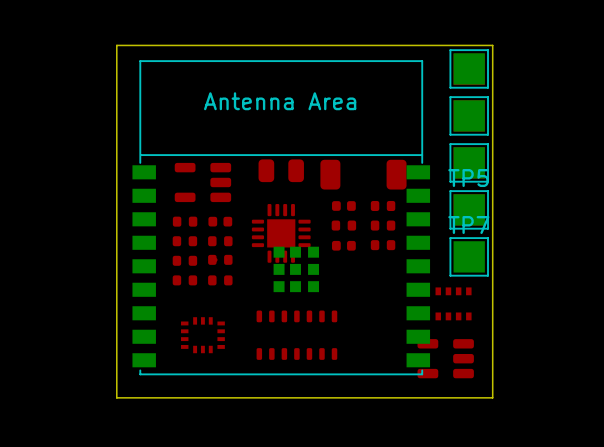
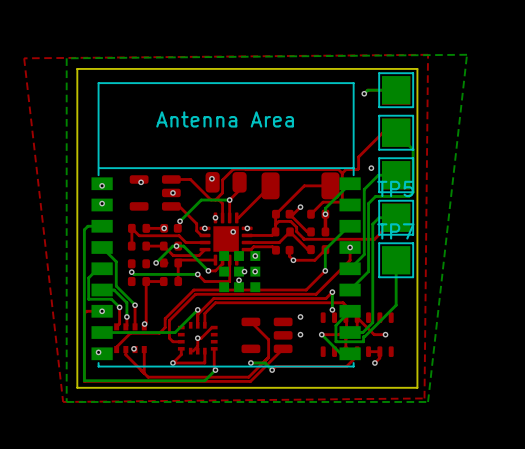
top zone outline: none -> (428, 54) (424, 398) (63, 401) (24, 58) (428, 54)
bottom zone outline: none -> (467, 54) (428, 401) (66, 401) (66, 58) (467, 54)
bottom track: none -> (396, 90) (367, 90) (364, 93)
via: none -> (364, 93)
top track: none -> (396, 132) (382, 132) (358, 157) (357, 169) (346, 169) (342, 173)
bottom track: none -> (396, 132) (413, 149) (413, 192) (408, 196) (375, 196) (368, 203) (368, 271) (350, 290)
via: none -> (371, 168)
top track: none -> (342, 173) (342, 200) (323, 202) (310, 214)
top track: none -> (342, 173) (338, 169) (233, 169) (222, 180) (222, 192) (215, 200)
bottom track: none -> (396, 175) (378, 175) (364, 189) (364, 254) (350, 268)
via: none -> (211, 178)
top track: none -> (171, 179) (190, 179) (211, 200) (219, 200) (222, 203) (222, 217)
via: none -> (141, 182)
top track: none -> (239, 182) (239, 190) (229, 200) (229, 217)
bottom track: none -> (350, 183) (325, 208) (325, 214)
via: none -> (102, 185)
top track: none -> (270, 185) (236, 217)
top track: none -> (330, 185) (304, 185) (275, 214) (275, 231) (272, 235) (247, 235)
via: none -> (172, 192)
bottom track: none -> (229, 200) (201, 200) (180, 221)
via: none -> (229, 200)
via: none -> (102, 203)
top track: none -> (171, 206) (179, 206) (196, 223) (196, 230) (201, 235) (205, 235)
top track: none -> (300, 207) (293, 214) (289, 214) (307, 231) (310, 231)
via: none -> (300, 207)
top track: none -> (325, 214) (325, 231)
via: none -> (325, 214)
via: none -> (215, 217)
top track: none -> (396, 217) (374, 239) (304, 239)
bottom track: none -> (396, 217) (379, 217) (372, 224) (372, 322) (362, 332) (350, 332)
via: none -> (180, 221)
top track: none -> (275, 224) (278, 221) (290, 221) (304, 239)
bottom track: none -> (102, 226) (87, 226) (84, 229) (84, 380) (204, 380) (215, 370)
bottom track: none -> (350, 226) (325, 249) (325, 270)
top track: none -> (164, 228) (146, 228)
via: none -> (164, 228)
via: none -> (204, 228)
via: none -> (247, 228)
via: none -> (233, 231)
top track: none -> (205, 242) (185, 242) (179, 235) (139, 235) (131, 228) (131, 245)
top track: none -> (247, 242) (279, 242) (290, 231) (307, 249) (310, 249)
top track: none -> (146, 246) (163, 246) (173, 255) (199, 255) (205, 249)
via: none -> (176, 246)
bottom track: none -> (102, 247) (116, 261) (116, 286) (135, 305)
top track: none -> (350, 247) (350, 260) (316, 294) (195, 294) (169, 320) (169, 338) (172, 341) (181, 341)
via: none -> (350, 247)
top track: none -> (247, 249) (253, 246) (272, 246) (275, 250)
top track: none -> (325, 249) (314, 260) (293, 260) (289, 256) (289, 250)
via: none -> (255, 256)
top track: none -> (215, 260) (181, 260) (178, 262) (178, 281)
top track: none -> (222, 260) (222, 263) (215, 270) (208, 270)
top track: none -> (229, 260) (229, 281) (204, 281) (197, 274)
via: none -> (293, 260)
bottom track: none -> (396, 260) (396, 305) (363, 336) (363, 341) (335, 341) (335, 325) (350, 311)
bottom track: none -> (156, 262) (172, 246) (183, 246) (208, 270)
via: none -> (156, 262)
bottom track: none -> (102, 268) (97, 268) (88, 277) (88, 299) (111, 299) (119, 307)
via: none -> (208, 270)
top track: none -> (325, 270) (306, 290) (193, 290) (165, 318) (165, 327) (159, 333) (130, 333) (116, 347) (116, 349)
via: none -> (325, 270)
via: none -> (244, 271)
via: none -> (255, 271)
bottom track: none -> (131, 272) (133, 274) (197, 274)
via: none -> (131, 272)
via: none -> (197, 274)
via: none -> (239, 280)
top track: none -> (163, 281) (146, 281) (146, 322) (144, 324)
bottom track: none -> (102, 290) (114, 290) (126, 302) (126, 316)
top track: none -> (332, 292) (326, 298) (213, 298) (197, 314)
bottom track: none -> (332, 292) (332, 309)
via: none -> (332, 292)
part position: (453, 303) -> (130, 338)
top track: none -> (135, 305) (135, 326)
via: none -> (135, 305)
top track: none -> (119, 307) (119, 323) (116, 326)
via: none -> (119, 307)
top track: none -> (197, 309) (197, 325)
bottom track: none -> (197, 309) (175, 332) (102, 332)
via: none -> (197, 309)
via: none -> (332, 309)
top track: none -> (102, 311) (86, 311) (84, 313) (84, 381) (250, 381) (283, 348)
via: none -> (102, 311)
top track: none -> (126, 316) (125, 326)
via: none -> (126, 316)
via: none -> (300, 316)
top track: none -> (250, 321) (268, 339) (268, 357) (248, 377) (148, 377) (125, 354) (125, 349)
via: none -> (144, 324)
top track: none -> (204, 325) (204, 313) (215, 302) (343, 302) (346, 306) (346, 327) (339, 334) (321, 334)
top track: none -> (214, 327) (201, 338) (197, 338) (197, 346) (192, 351)
part position: (202, 335) -> (197, 338)
part position: (296, 335) -> (357, 334)
via: none -> (300, 334)
bottom track: none -> (321, 334) (340, 353) (350, 353)
via: none -> (321, 334)
top track: none -> (385, 334) (374, 334) (357, 317) (357, 327) (345, 338) (345, 351)
via: none -> (385, 334)
via: none -> (197, 338)
via: none -> (133, 348)
top track: none -> (181, 348) (181, 354) (172, 363) (204, 363) (204, 351)
top track: none -> (214, 348) (215, 370)
top track: none -> (144, 349) (144, 373)
top track: none -> (357, 351) (357, 355) (346, 366) (275, 366) (272, 370)
top track: none -> (368, 351) (379, 351) (379, 358) (374, 363)
via: none -> (98, 352)
part position: (445, 358) -> (267, 335)
via: none -> (172, 363)
bottom track: none -> (250, 363) (265, 363) (272, 370)
via: none -> (250, 363)
via: none -> (374, 363)
via: none -> (215, 370)
via: none -> (272, 370)

